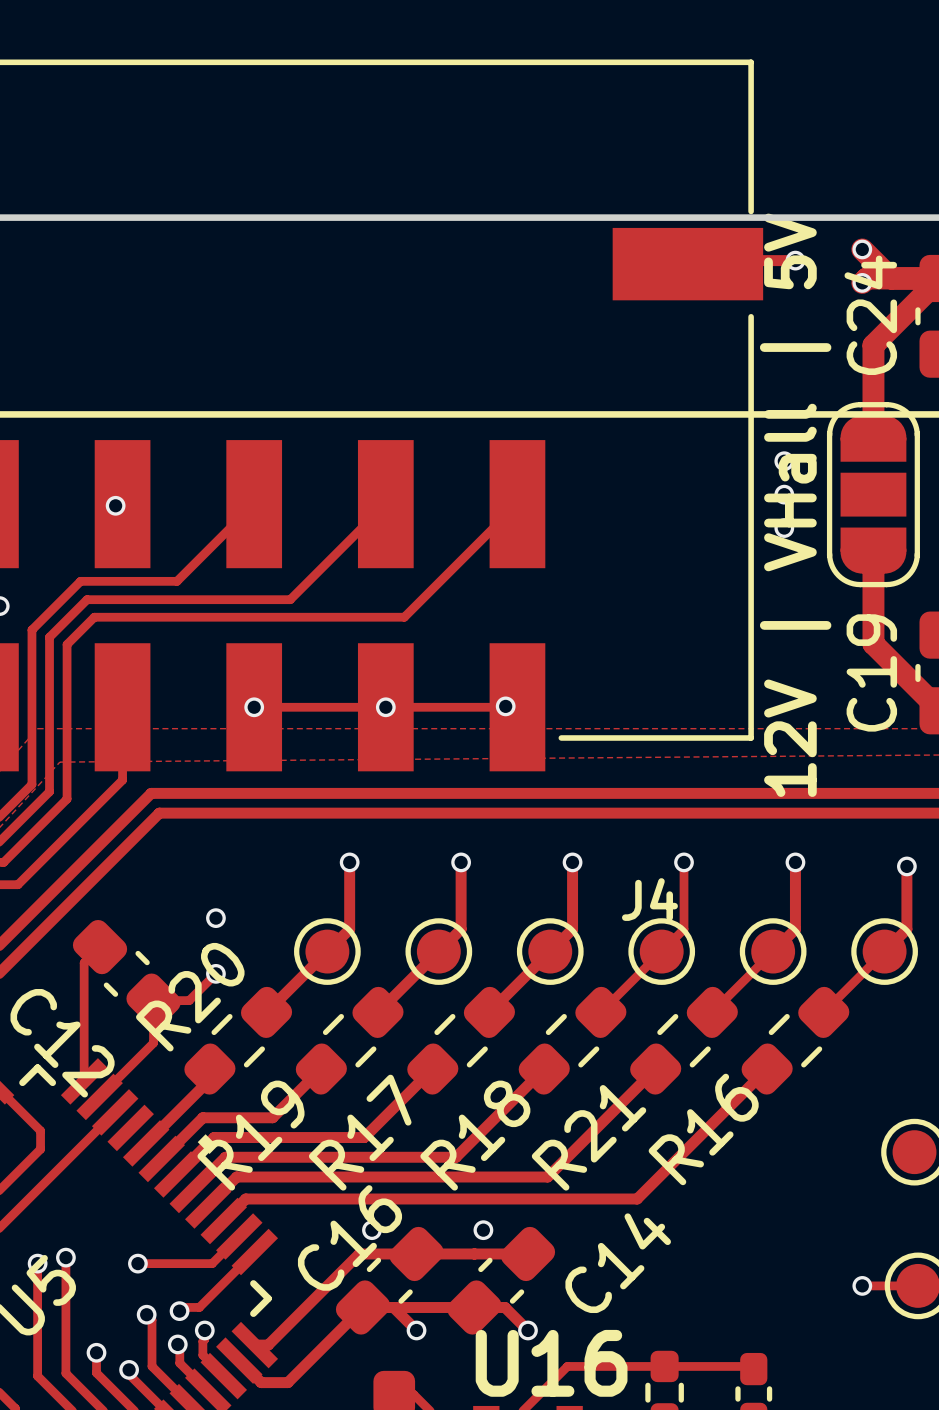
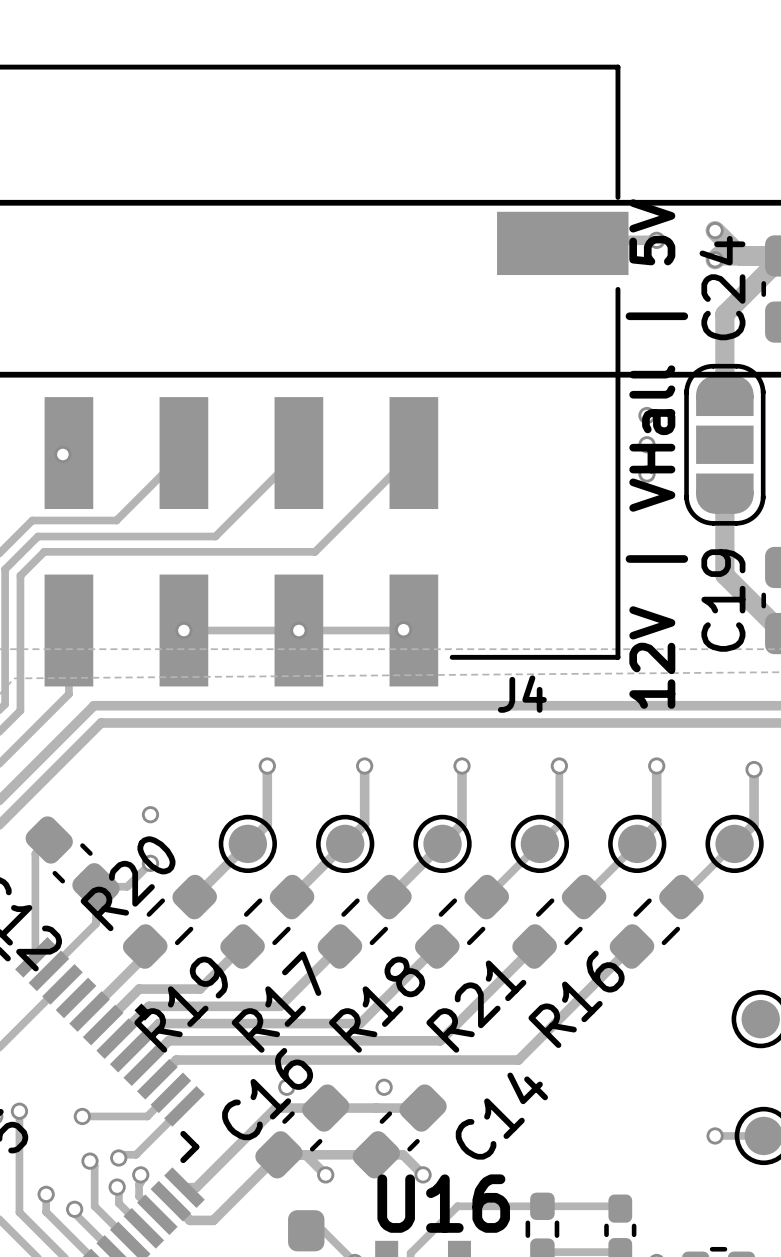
J4 name position: J4 (649, 899) -> J4 (522, 694)

